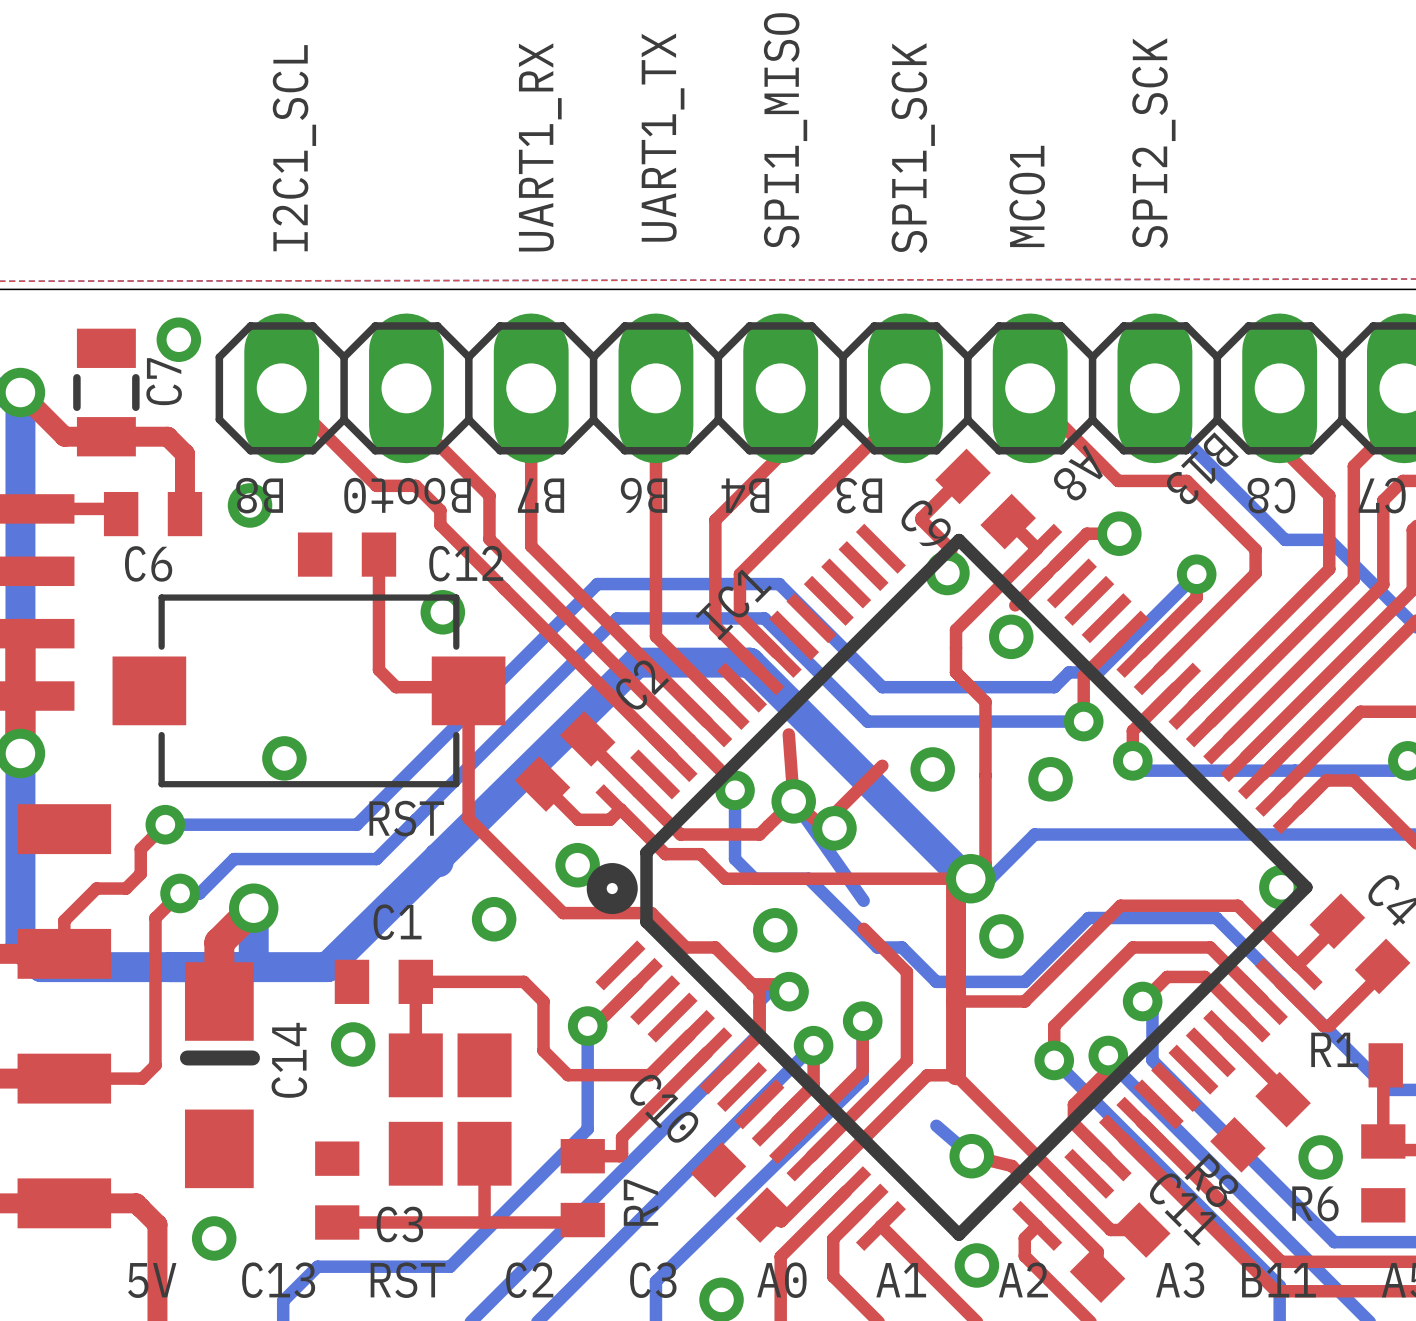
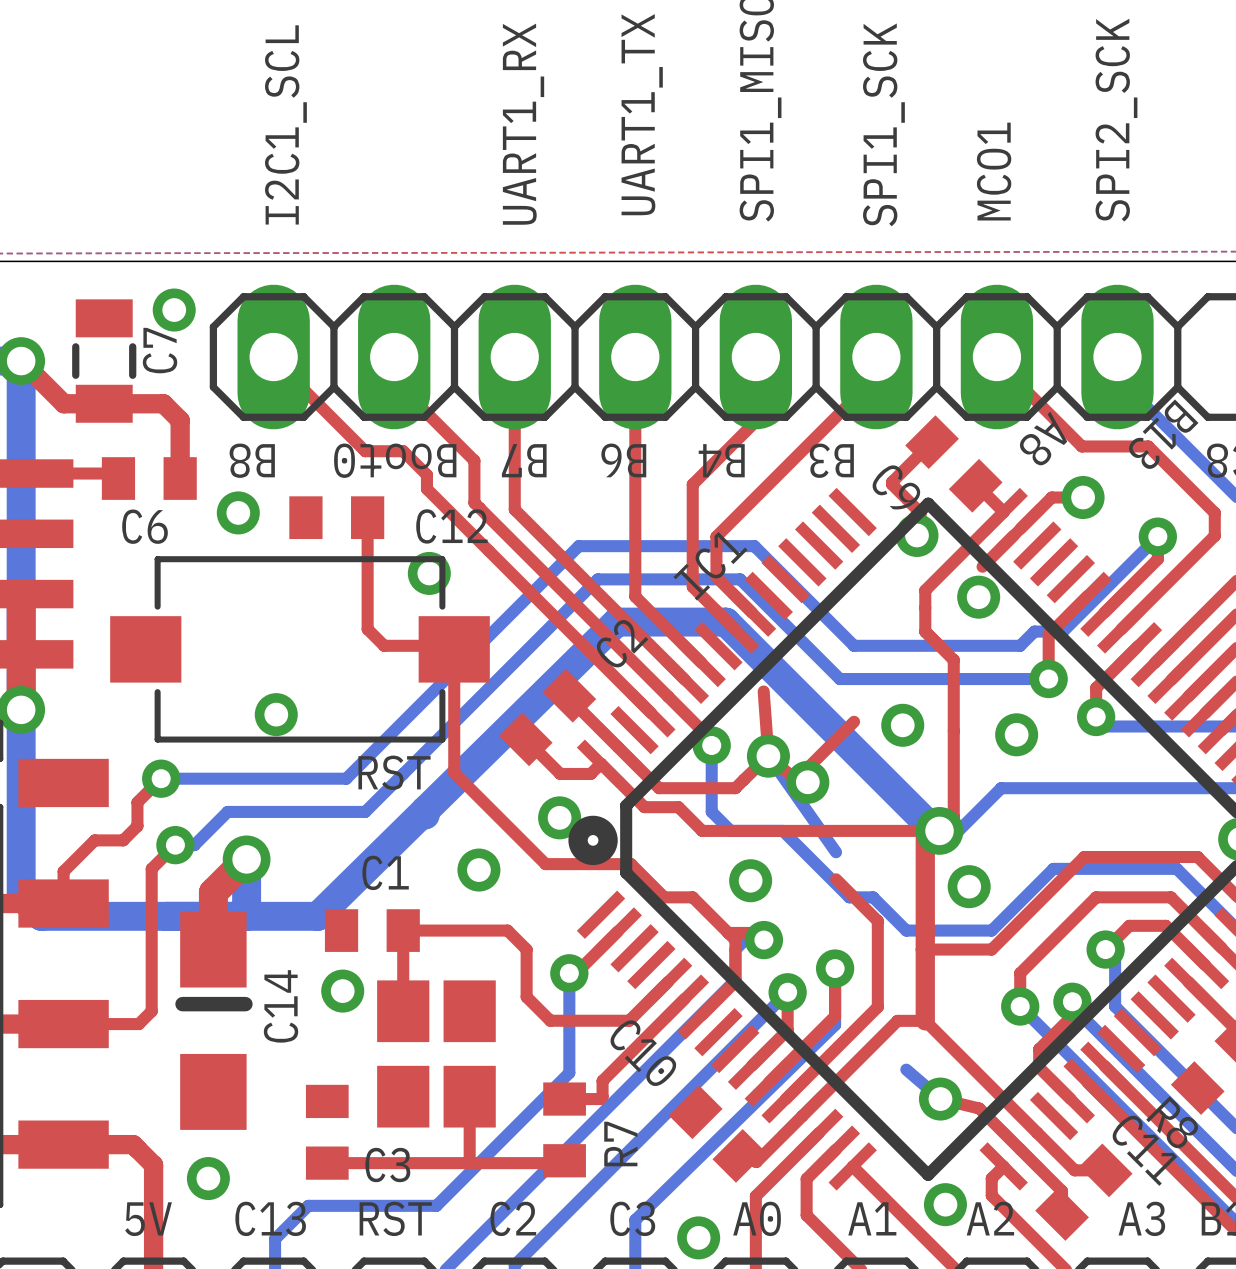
via position: (250, 505) -> (238, 512)

